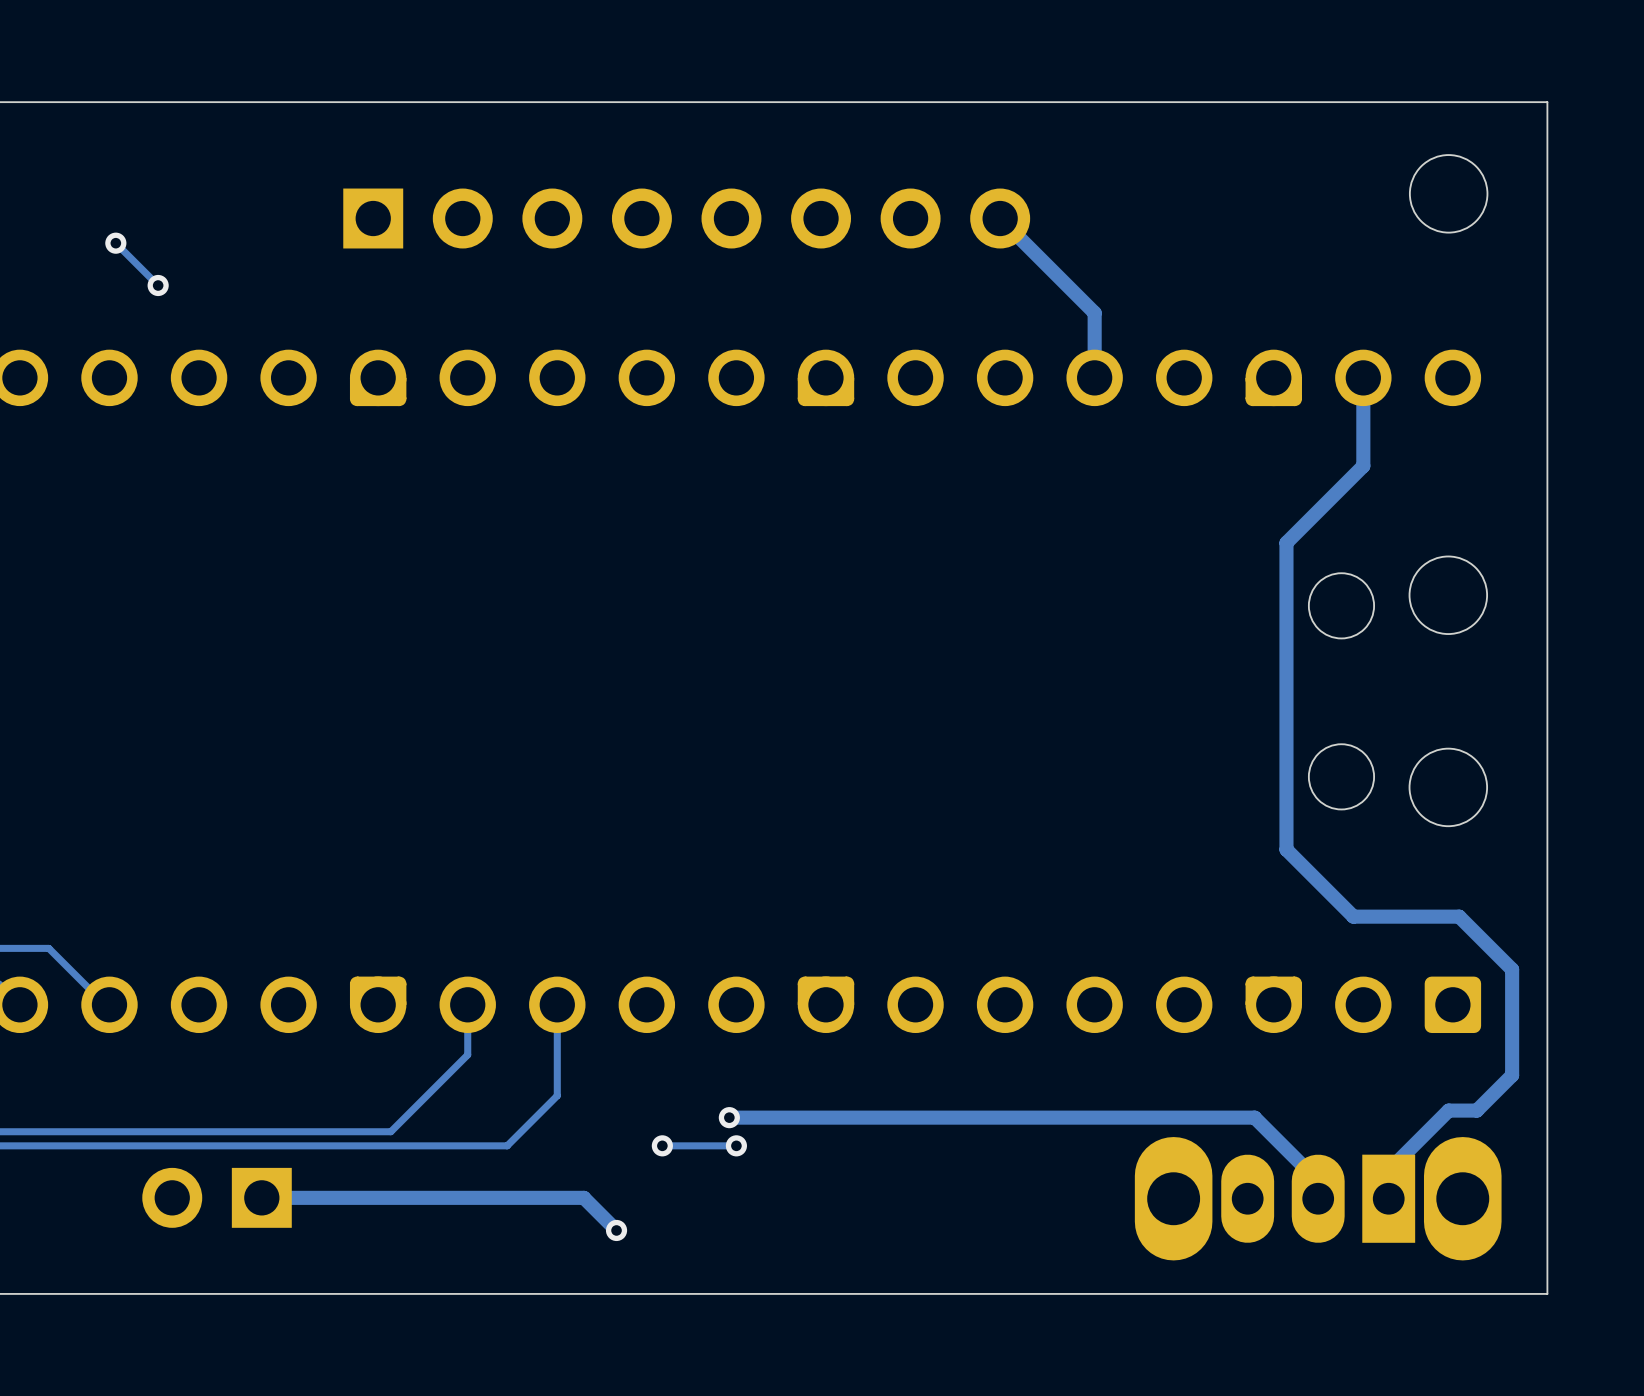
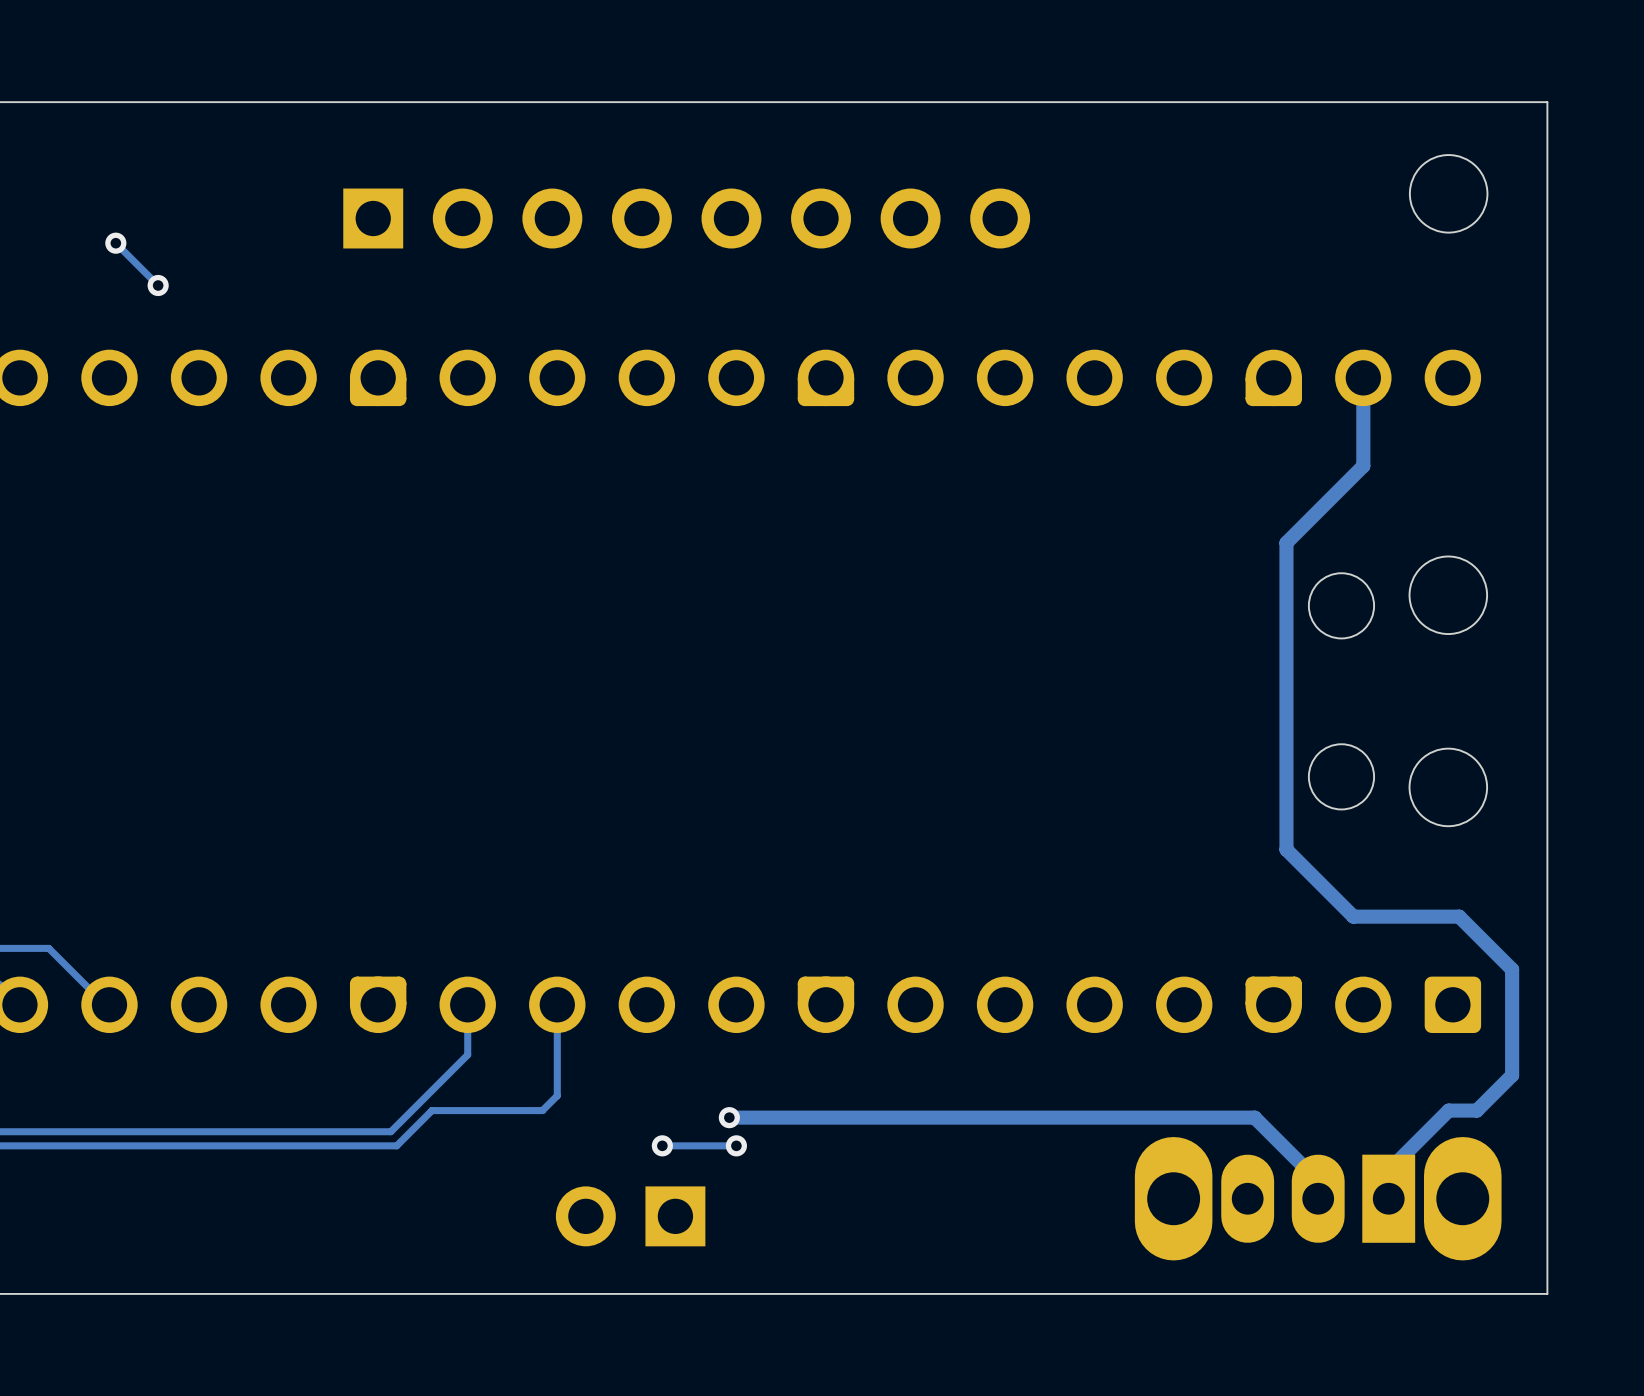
track: (1000, 218) (1094, 313) (1094, 377) -> none
track: (542, 1110) (507, 1145) (396, 1145) -> (542, 1110) (431, 1110) (396, 1145)
part position: (217, 1197) -> (630, 1216)
track: (261, 1197) (583, 1197) (616, 1230) -> none
via: (616, 1230) -> none

